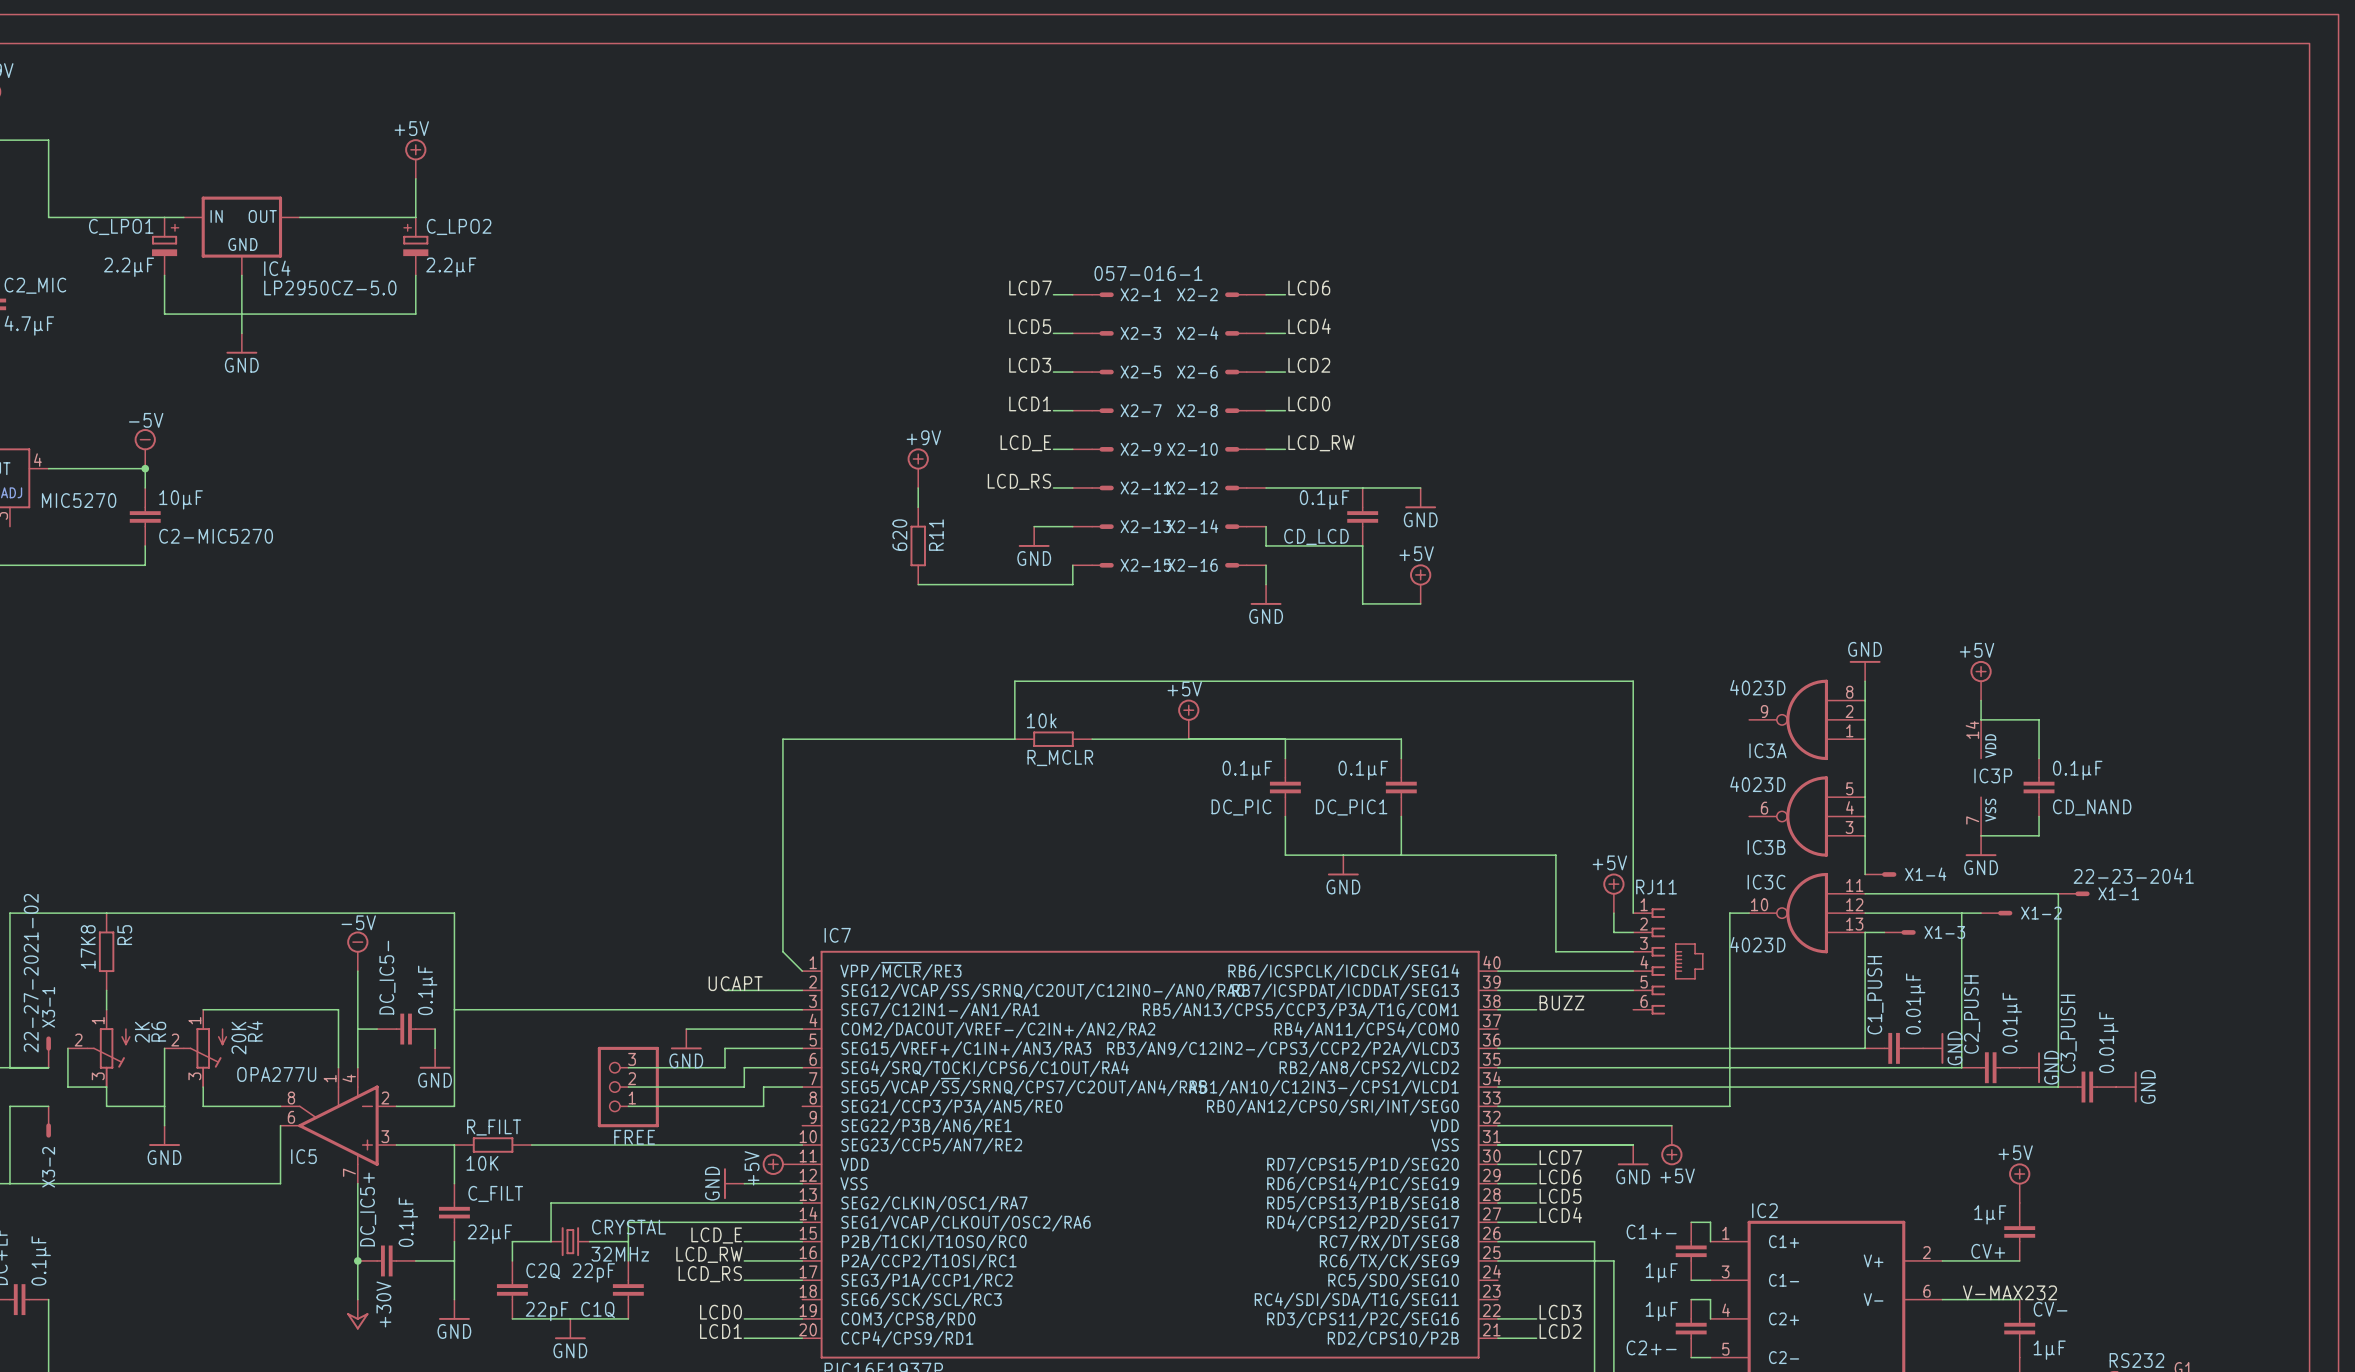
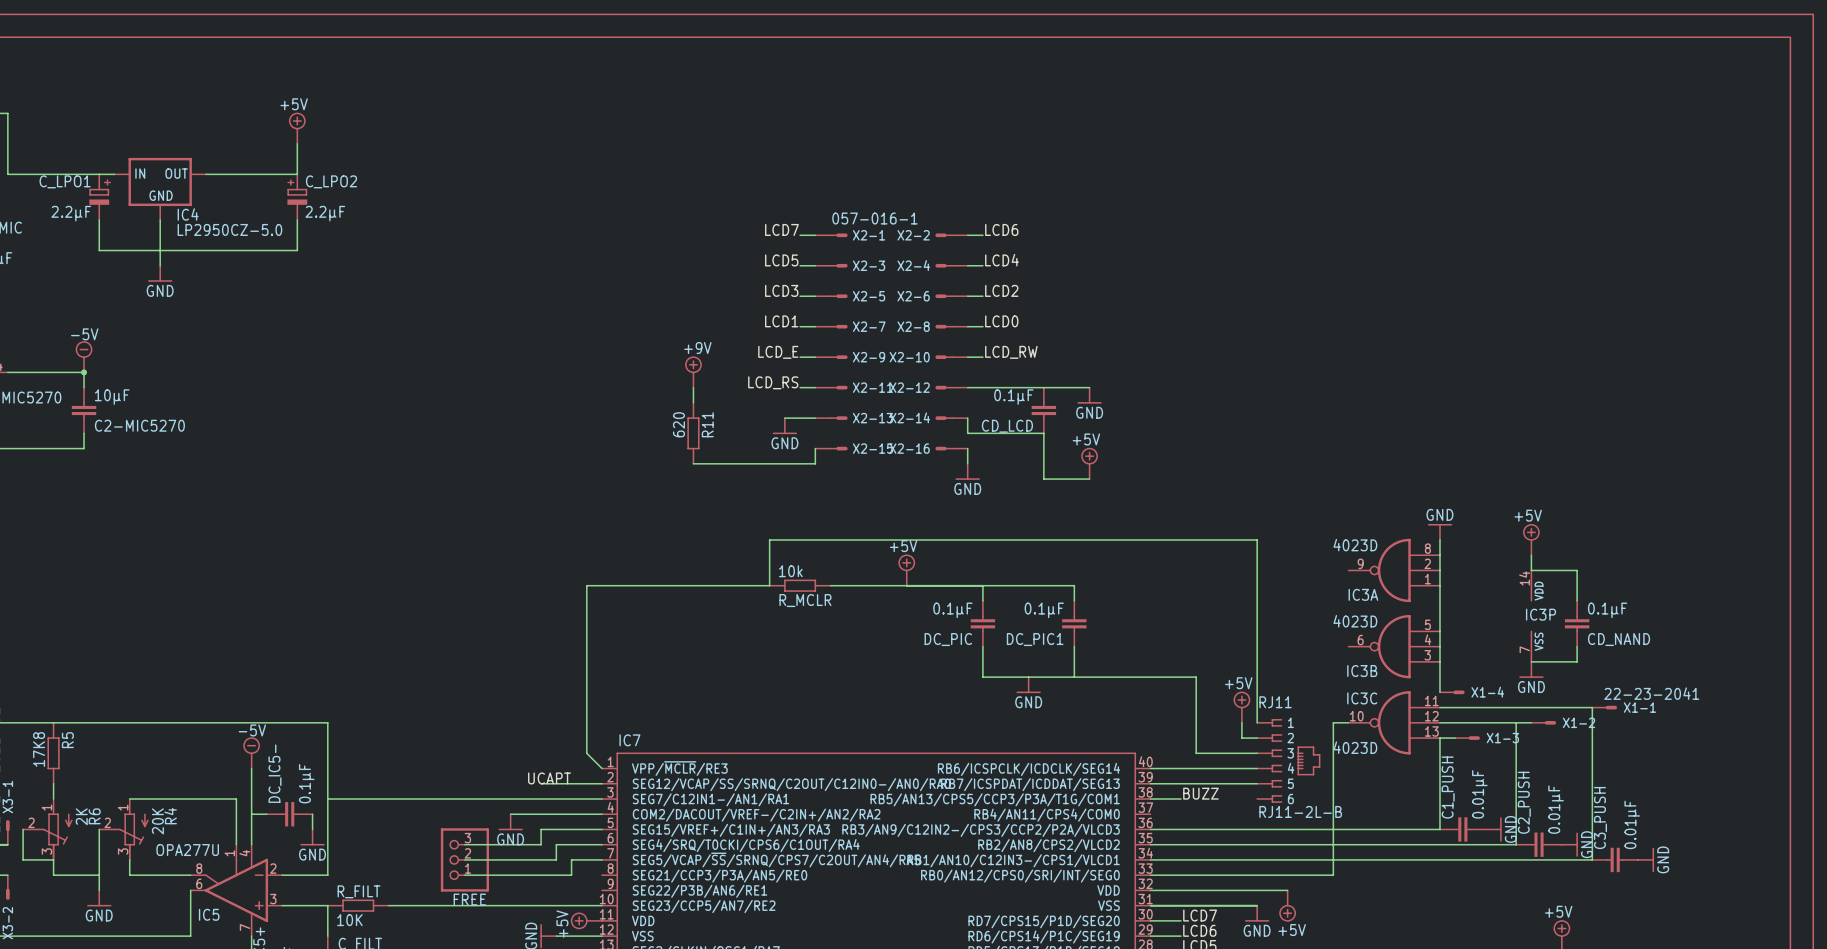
RJ11 symbol: [1633, 908, 1704, 1015] -> [1257, 719, 1321, 803]
RJ11 value: none -> RJ11-2L-B (1300, 811)

